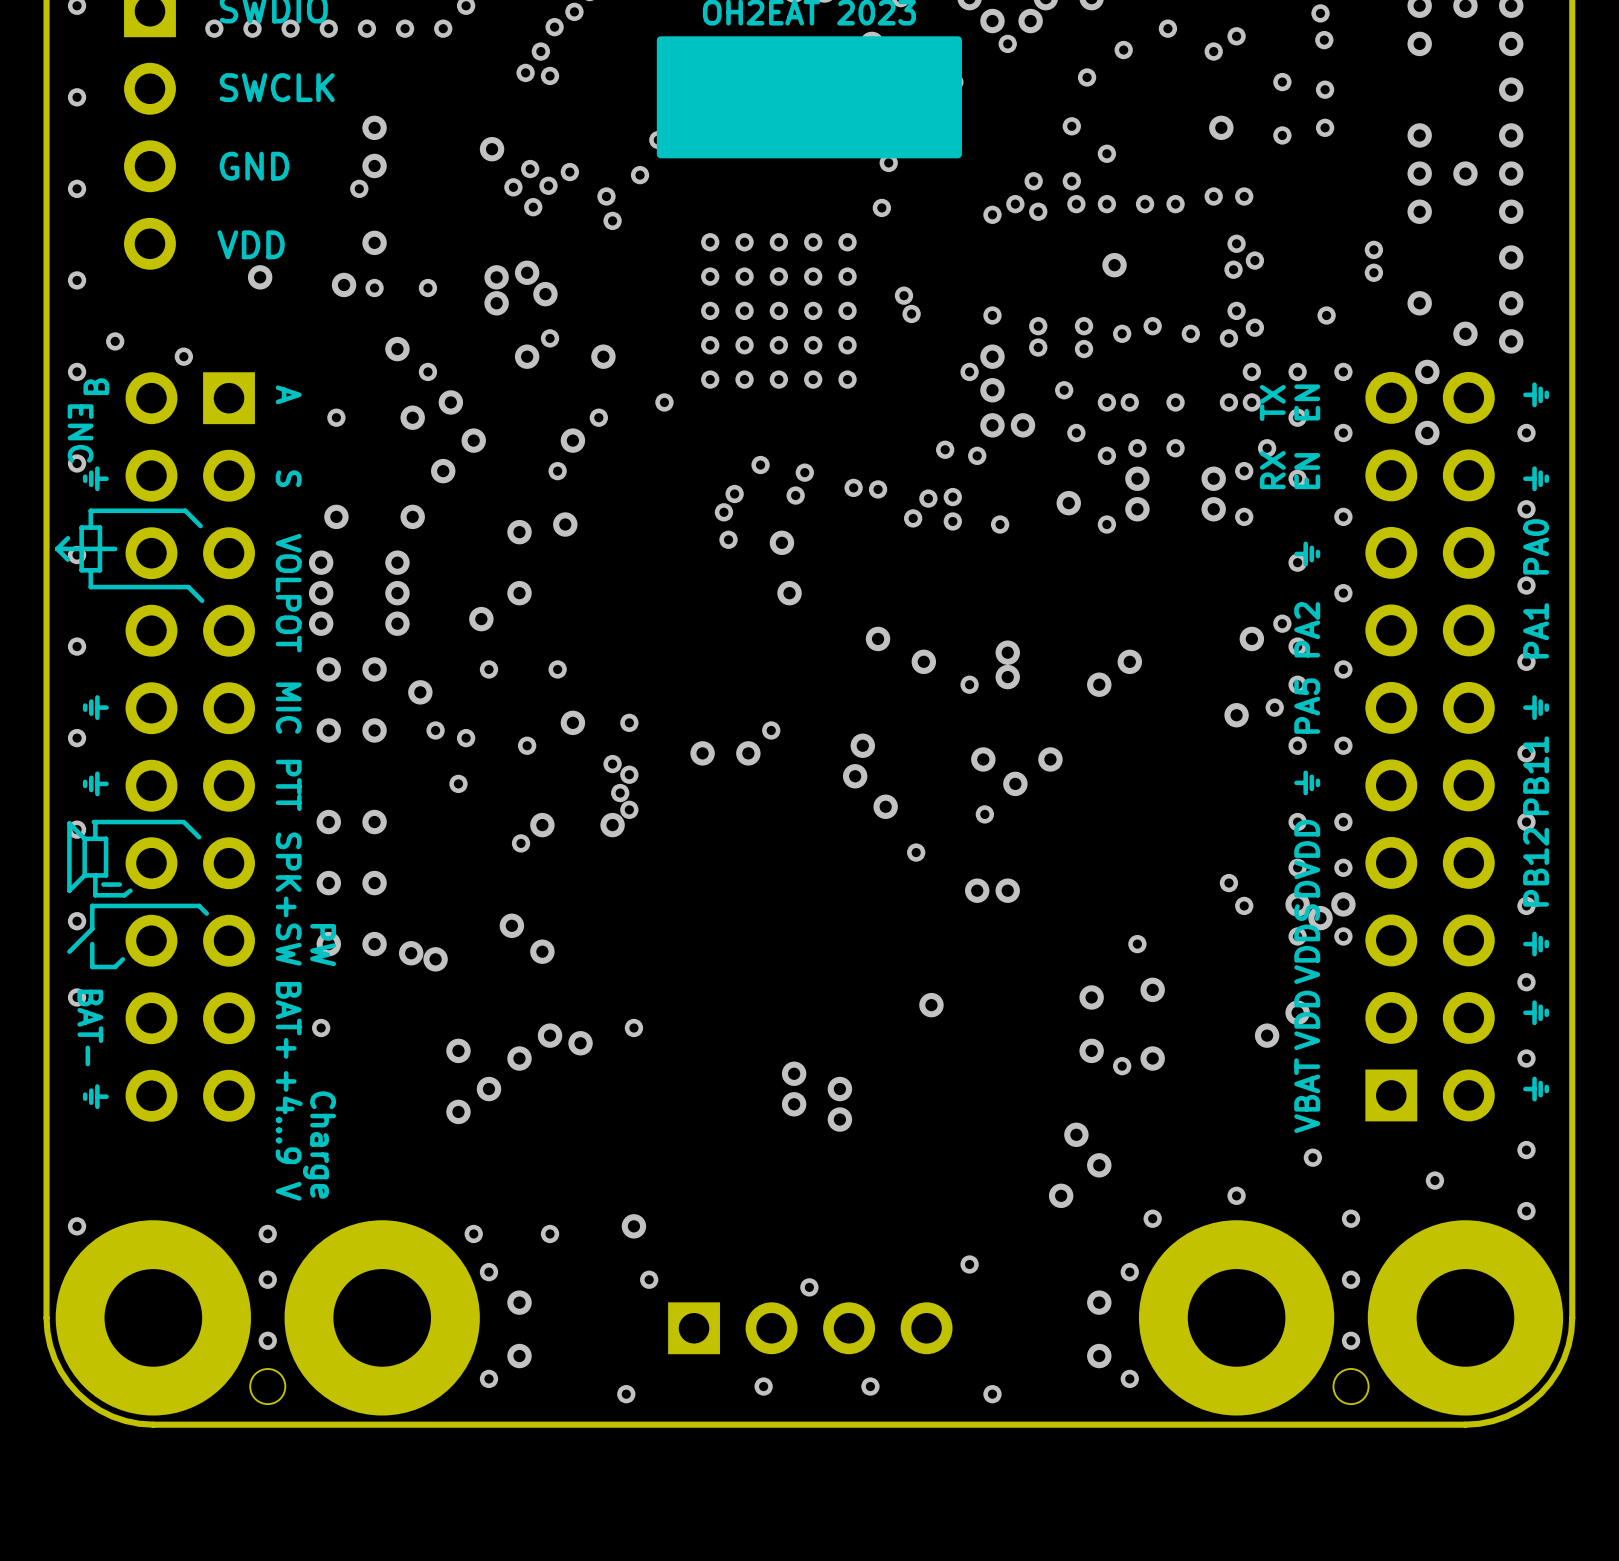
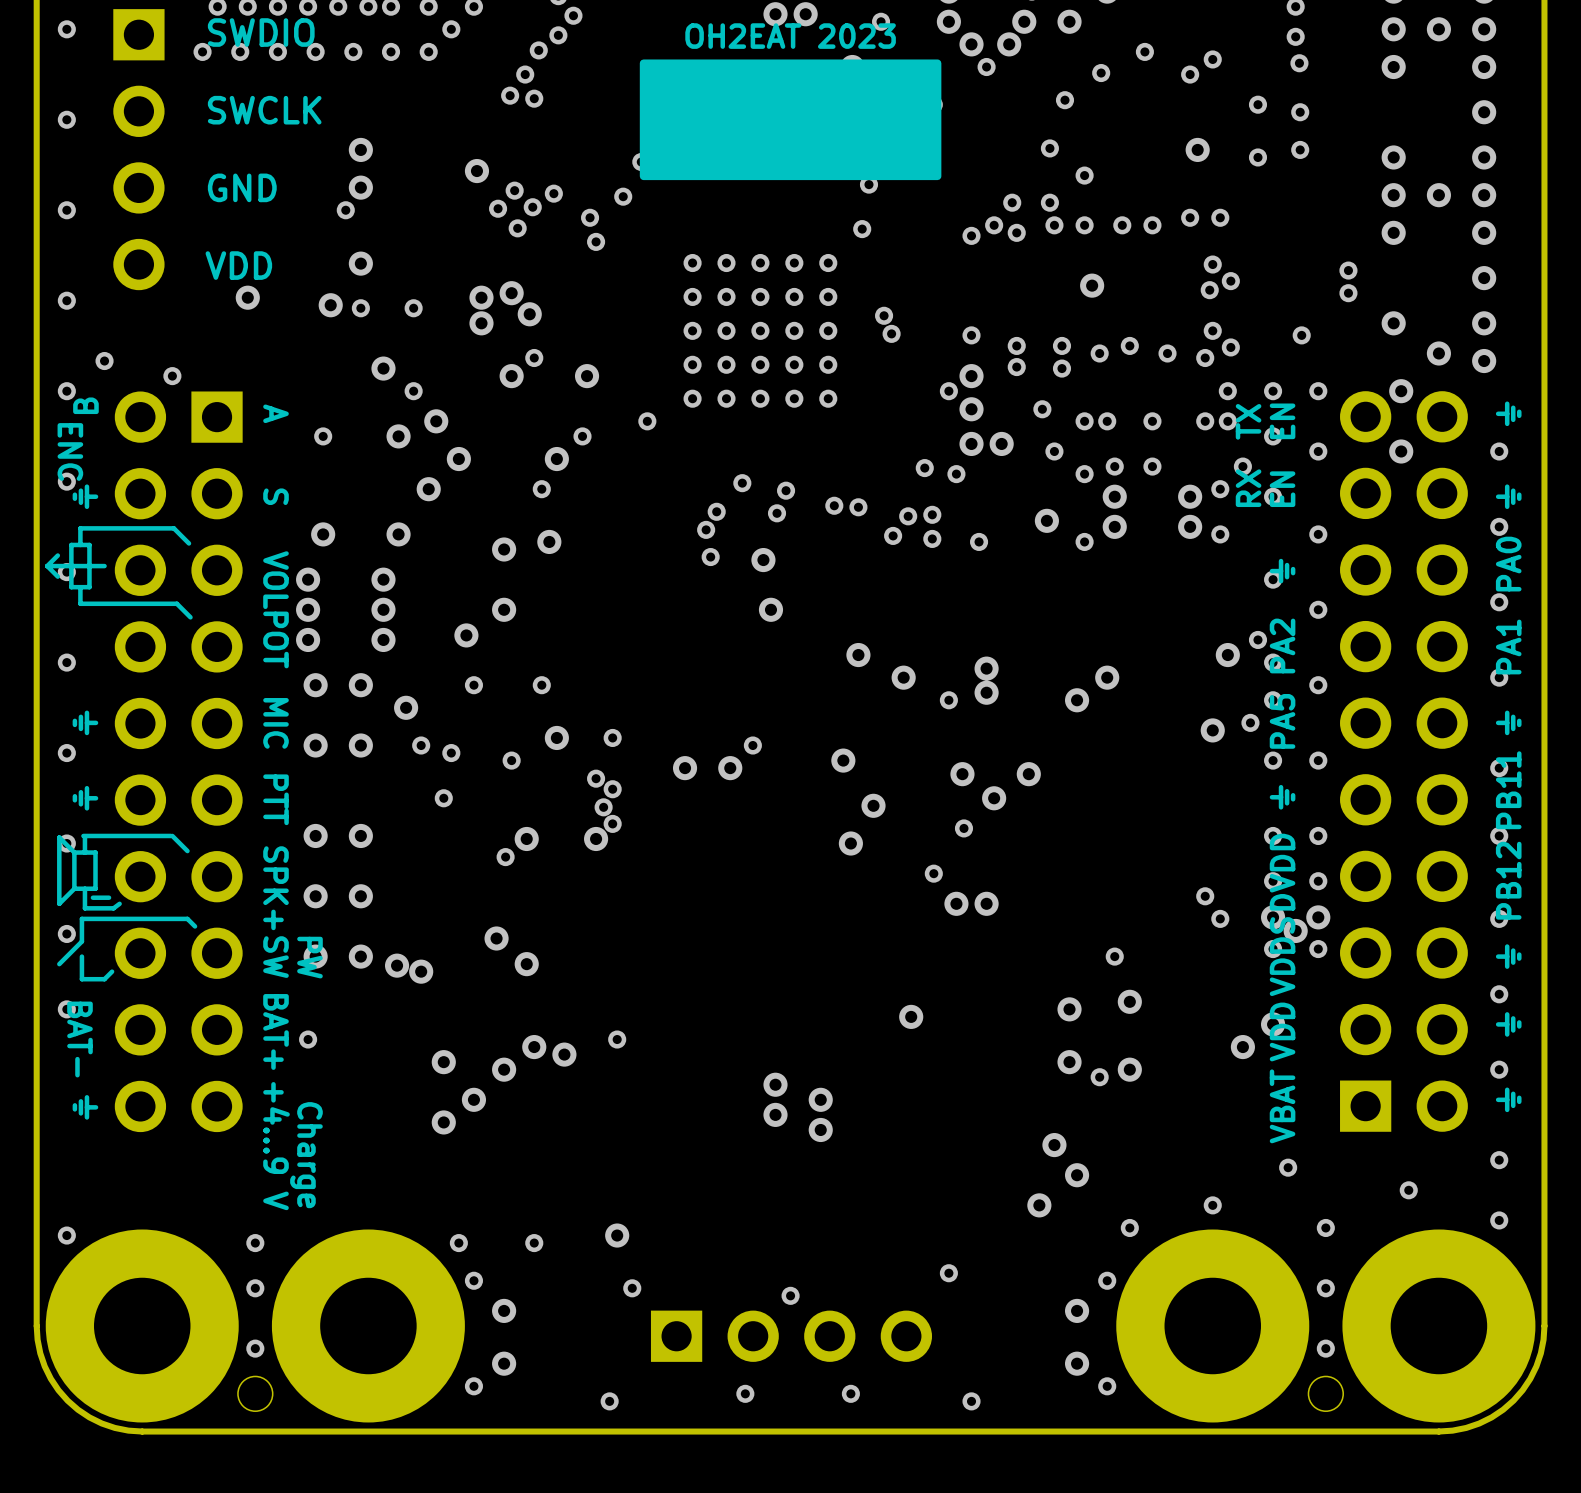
via: (855, 776) -> none
via: none -> (873, 805)
via: (885, 806) -> none
via: none -> (850, 843)
via position: (916, 852) -> (933, 873)

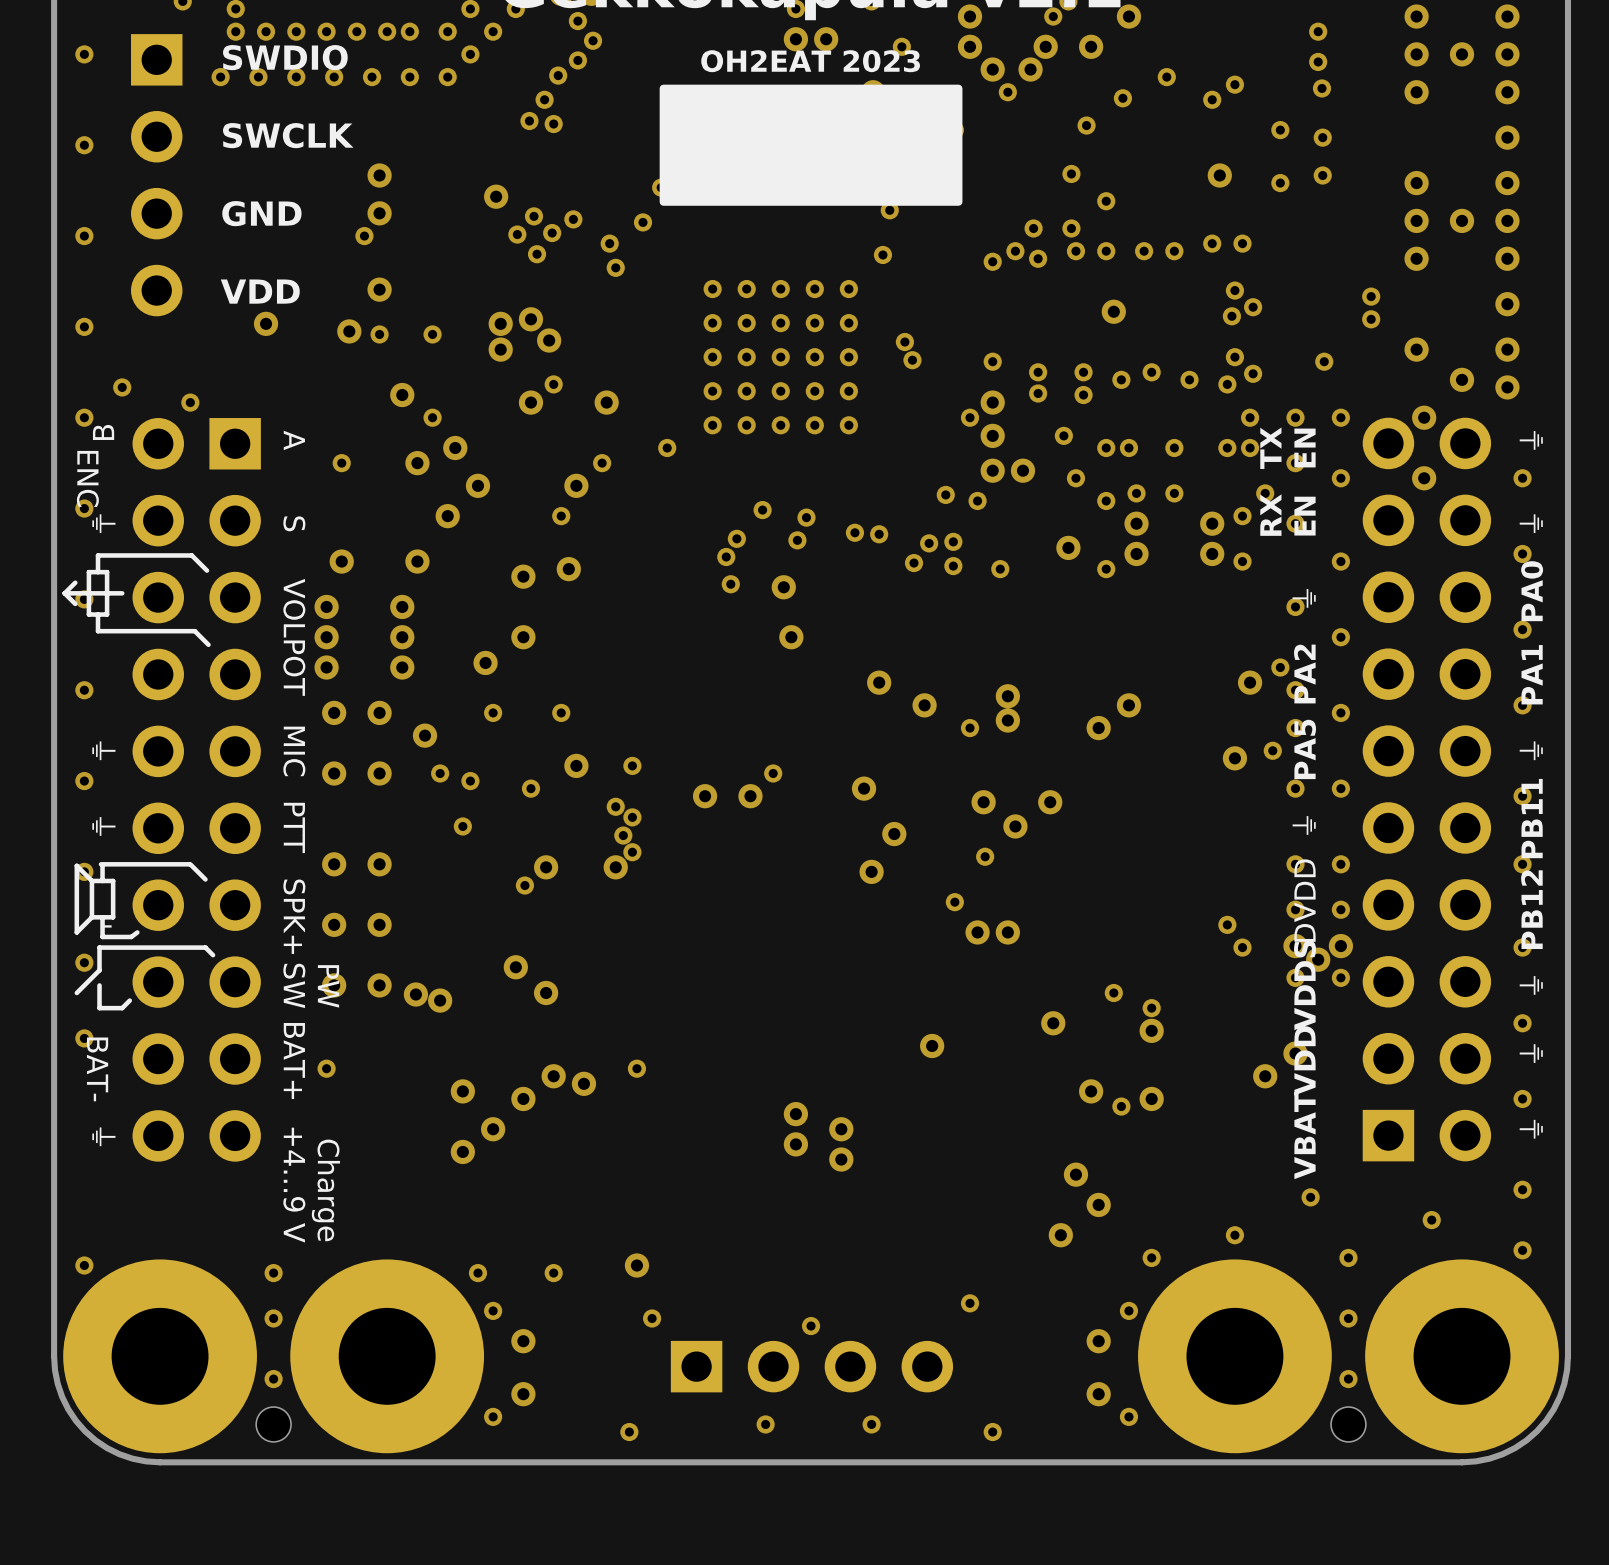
via: (1114, 956) -> none
via: none -> (1113, 993)
via: none -> (1151, 1008)
via position: (1069, 1009) -> (1053, 1023)

